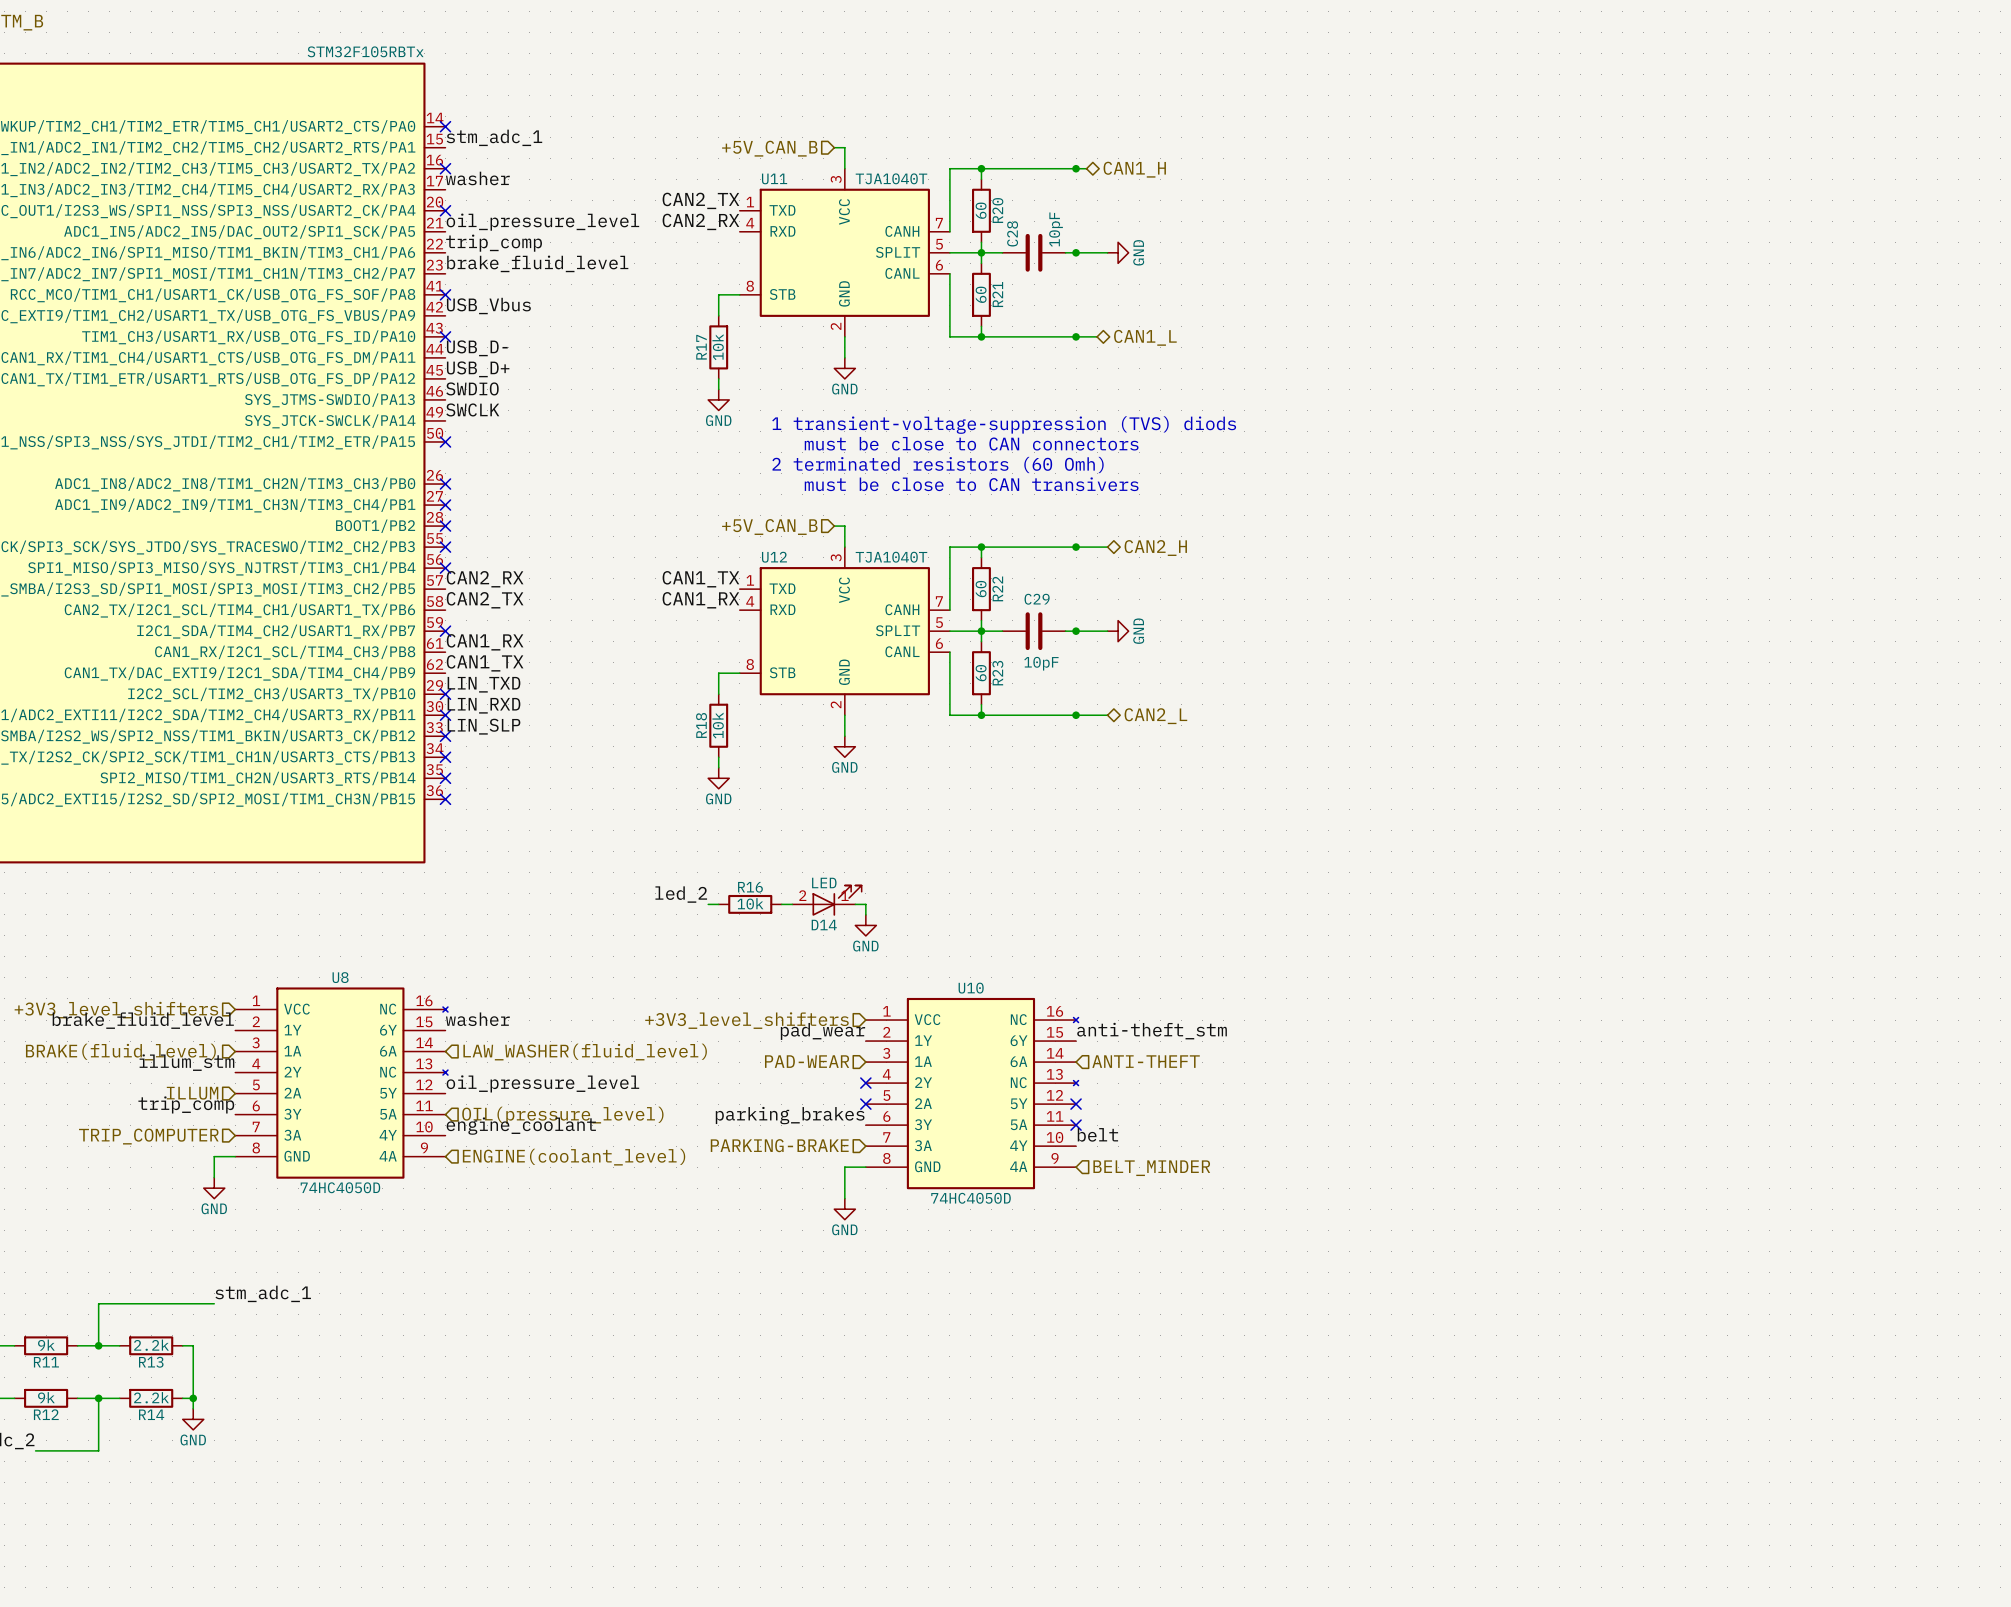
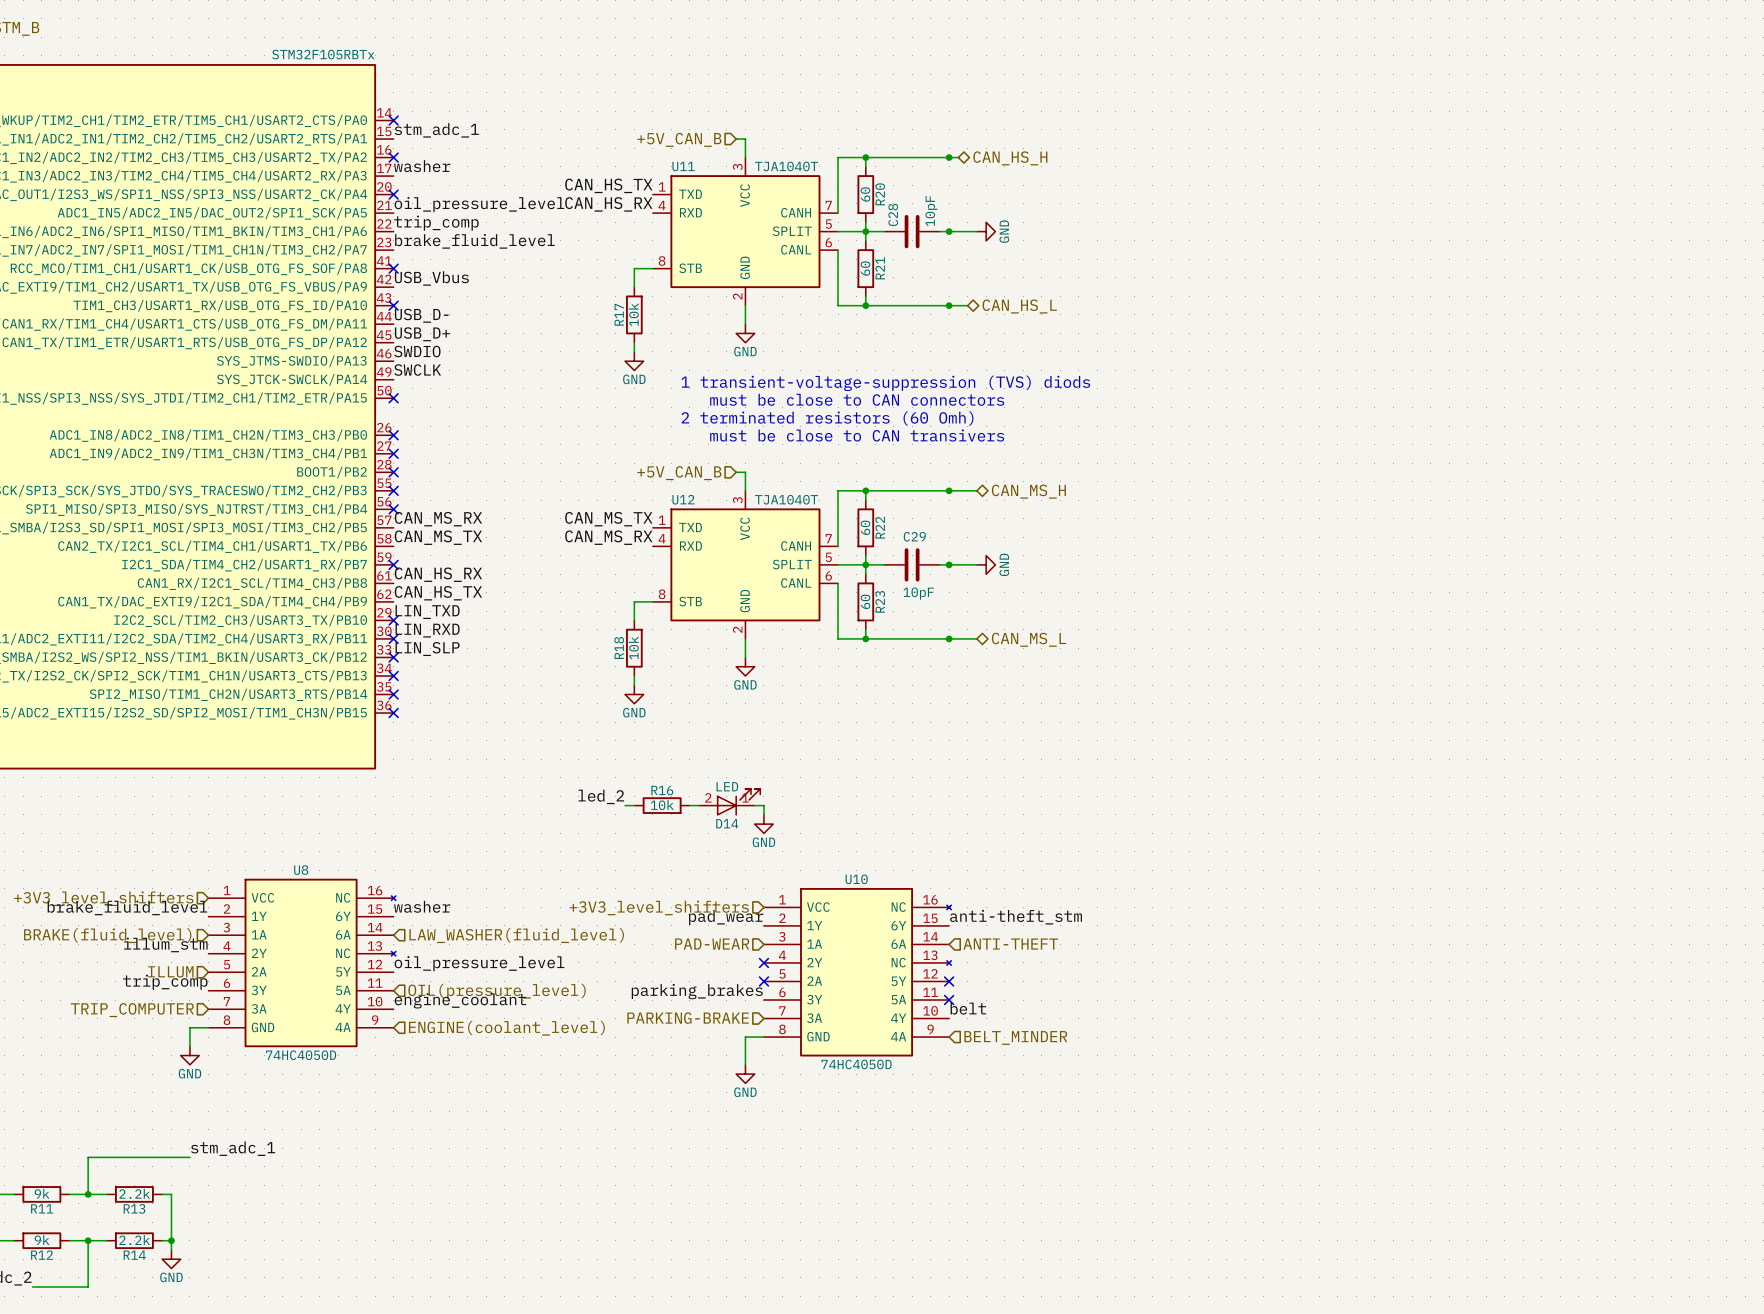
hierarchical label: CAN1_H (1134, 169) -> CAN_HS_H (1010, 158)
label: CAN2_TX (700, 200) -> CAN_HS_TX (608, 185)
label: CAN2_RX (700, 221) -> CAN_HS_RX (608, 204)
hierarchical label: CAN1_L (1145, 337) -> CAN_HS_L (1019, 306)
hierarchical label: CAN2_H (1155, 548) -> CAN_MS_H (1028, 491)
label: CAN2_RX (485, 579) -> CAN_MS_RX (438, 519)
label: CAN1_TX (700, 579) -> CAN_MS_TX (608, 519)
label: CAN2_TX (485, 600) -> CAN_MS_TX (438, 537)
label: CAN1_RX (700, 600) -> CAN_MS_RX (608, 537)
label: CAN1_RX (485, 642) -> CAN_HS_RX (438, 574)
label: CAN1_TX (485, 663) -> CAN_HS_TX (438, 593)
hierarchical label: CAN2_L (1155, 716) -> CAN_MS_L (1029, 639)

